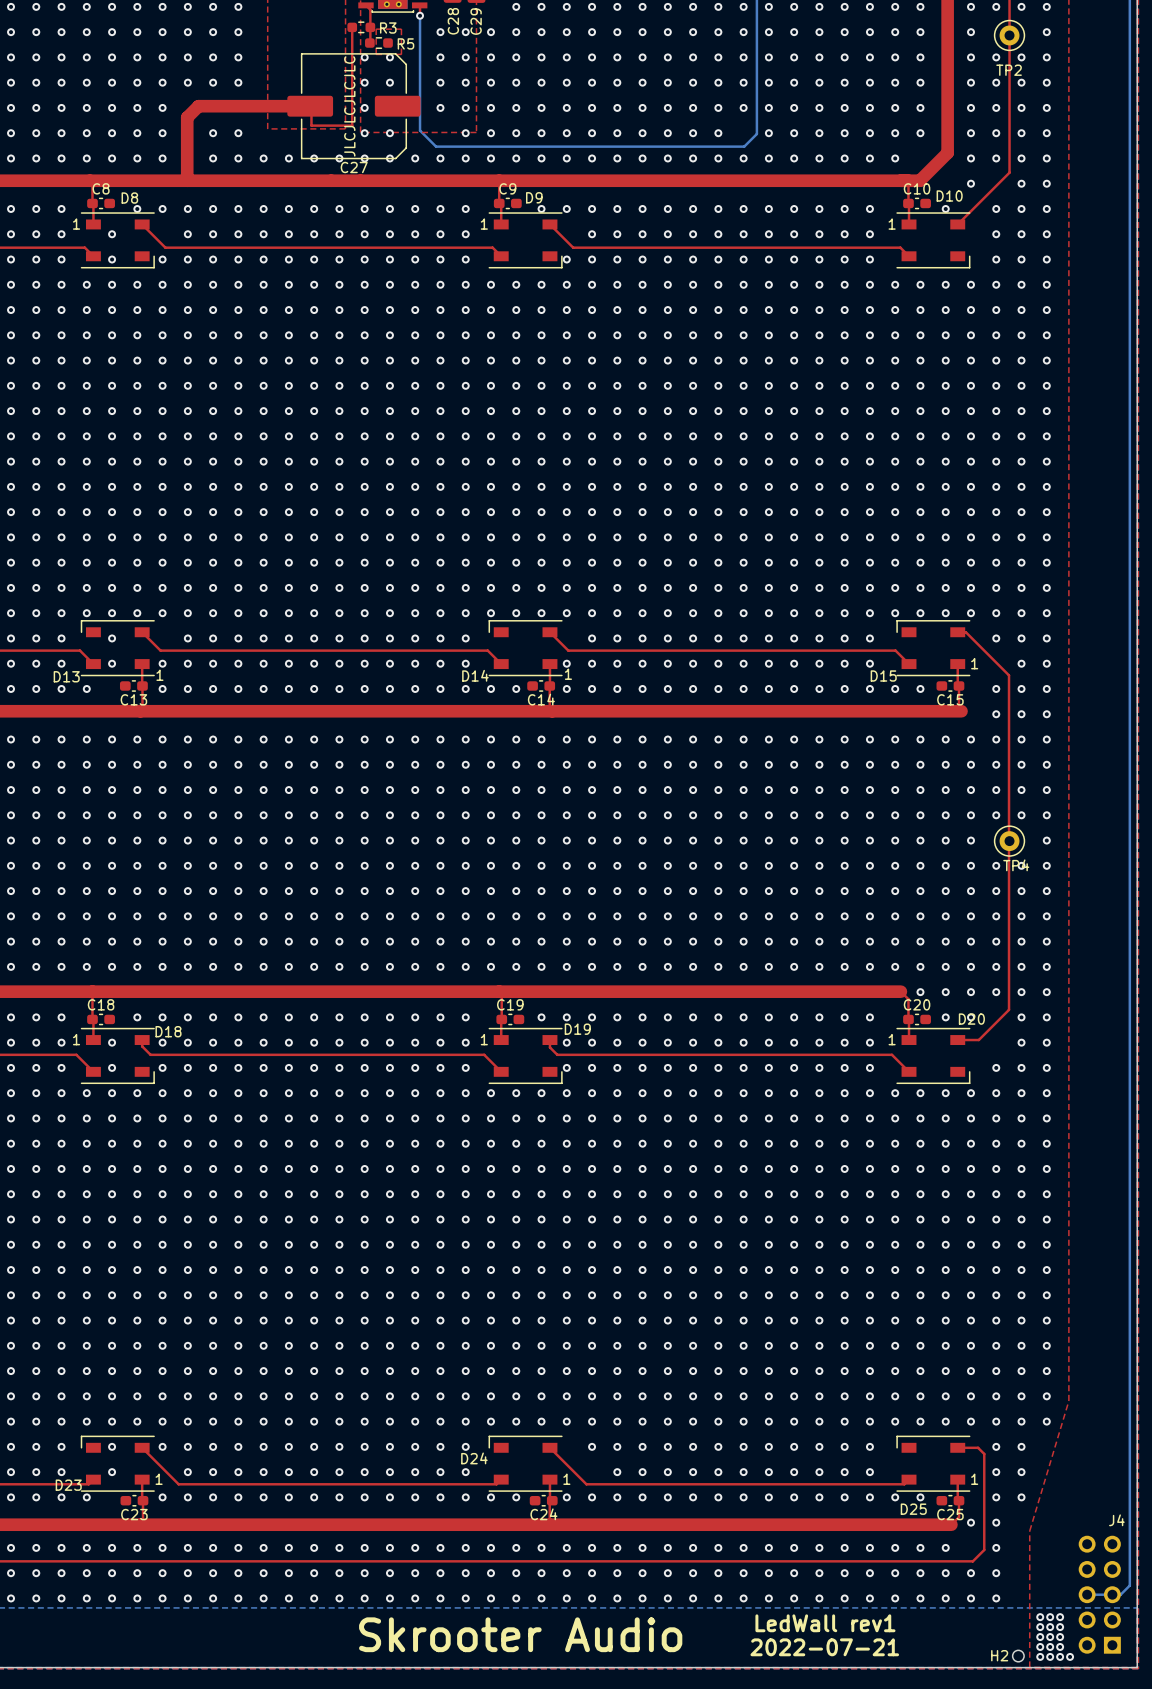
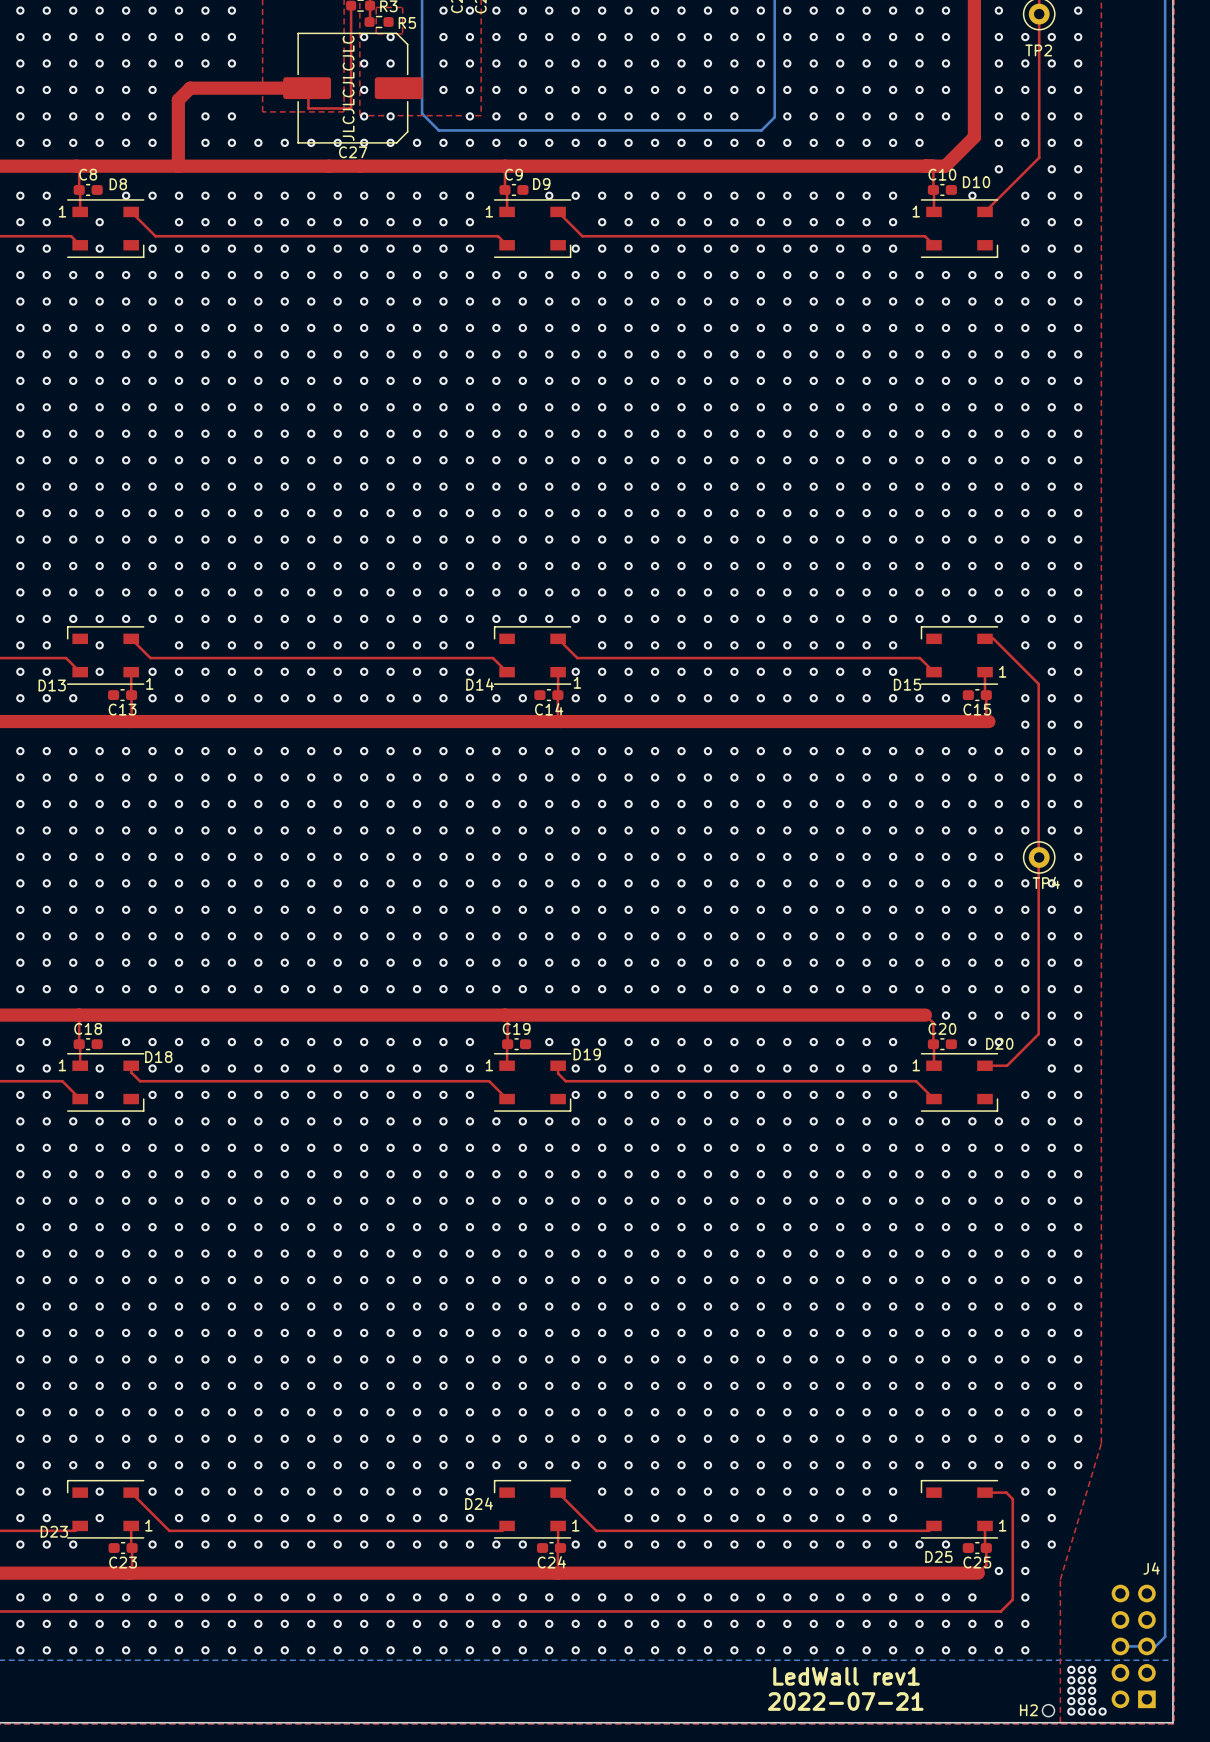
text: Skrooter Audio (520, 1634) -> none

